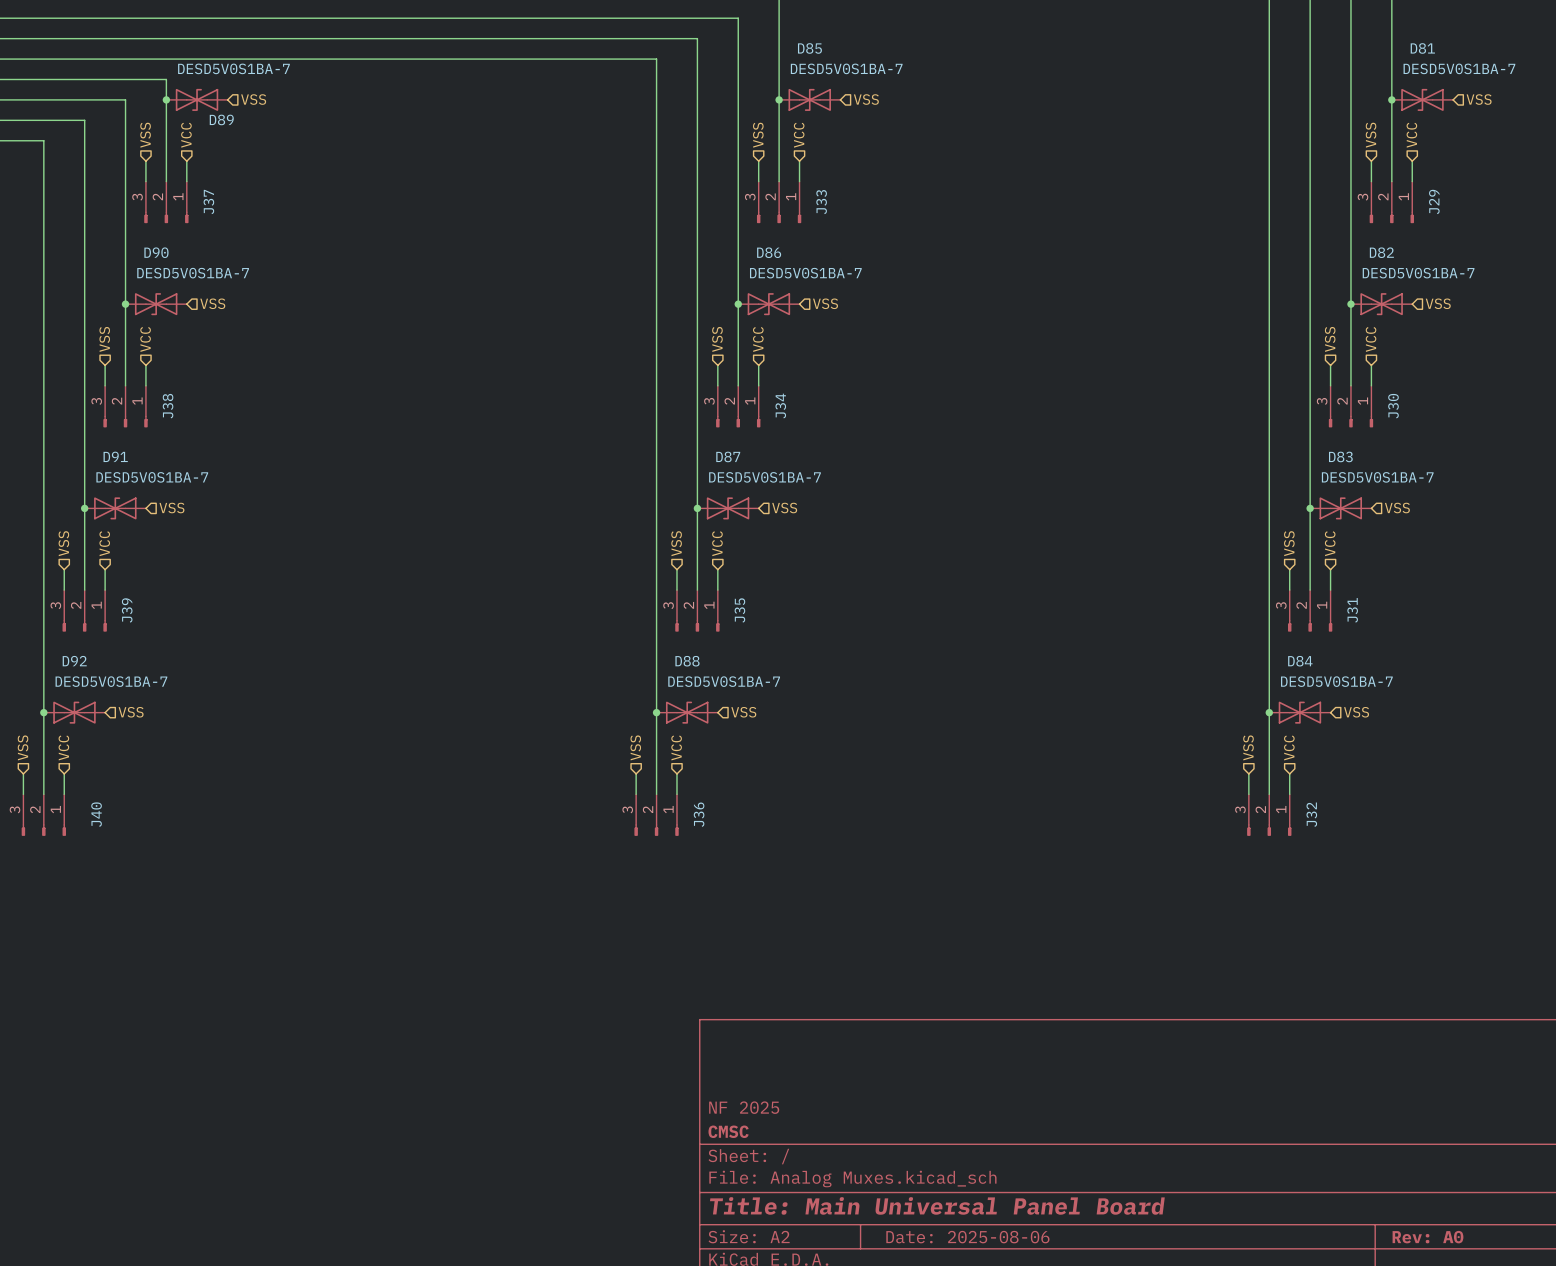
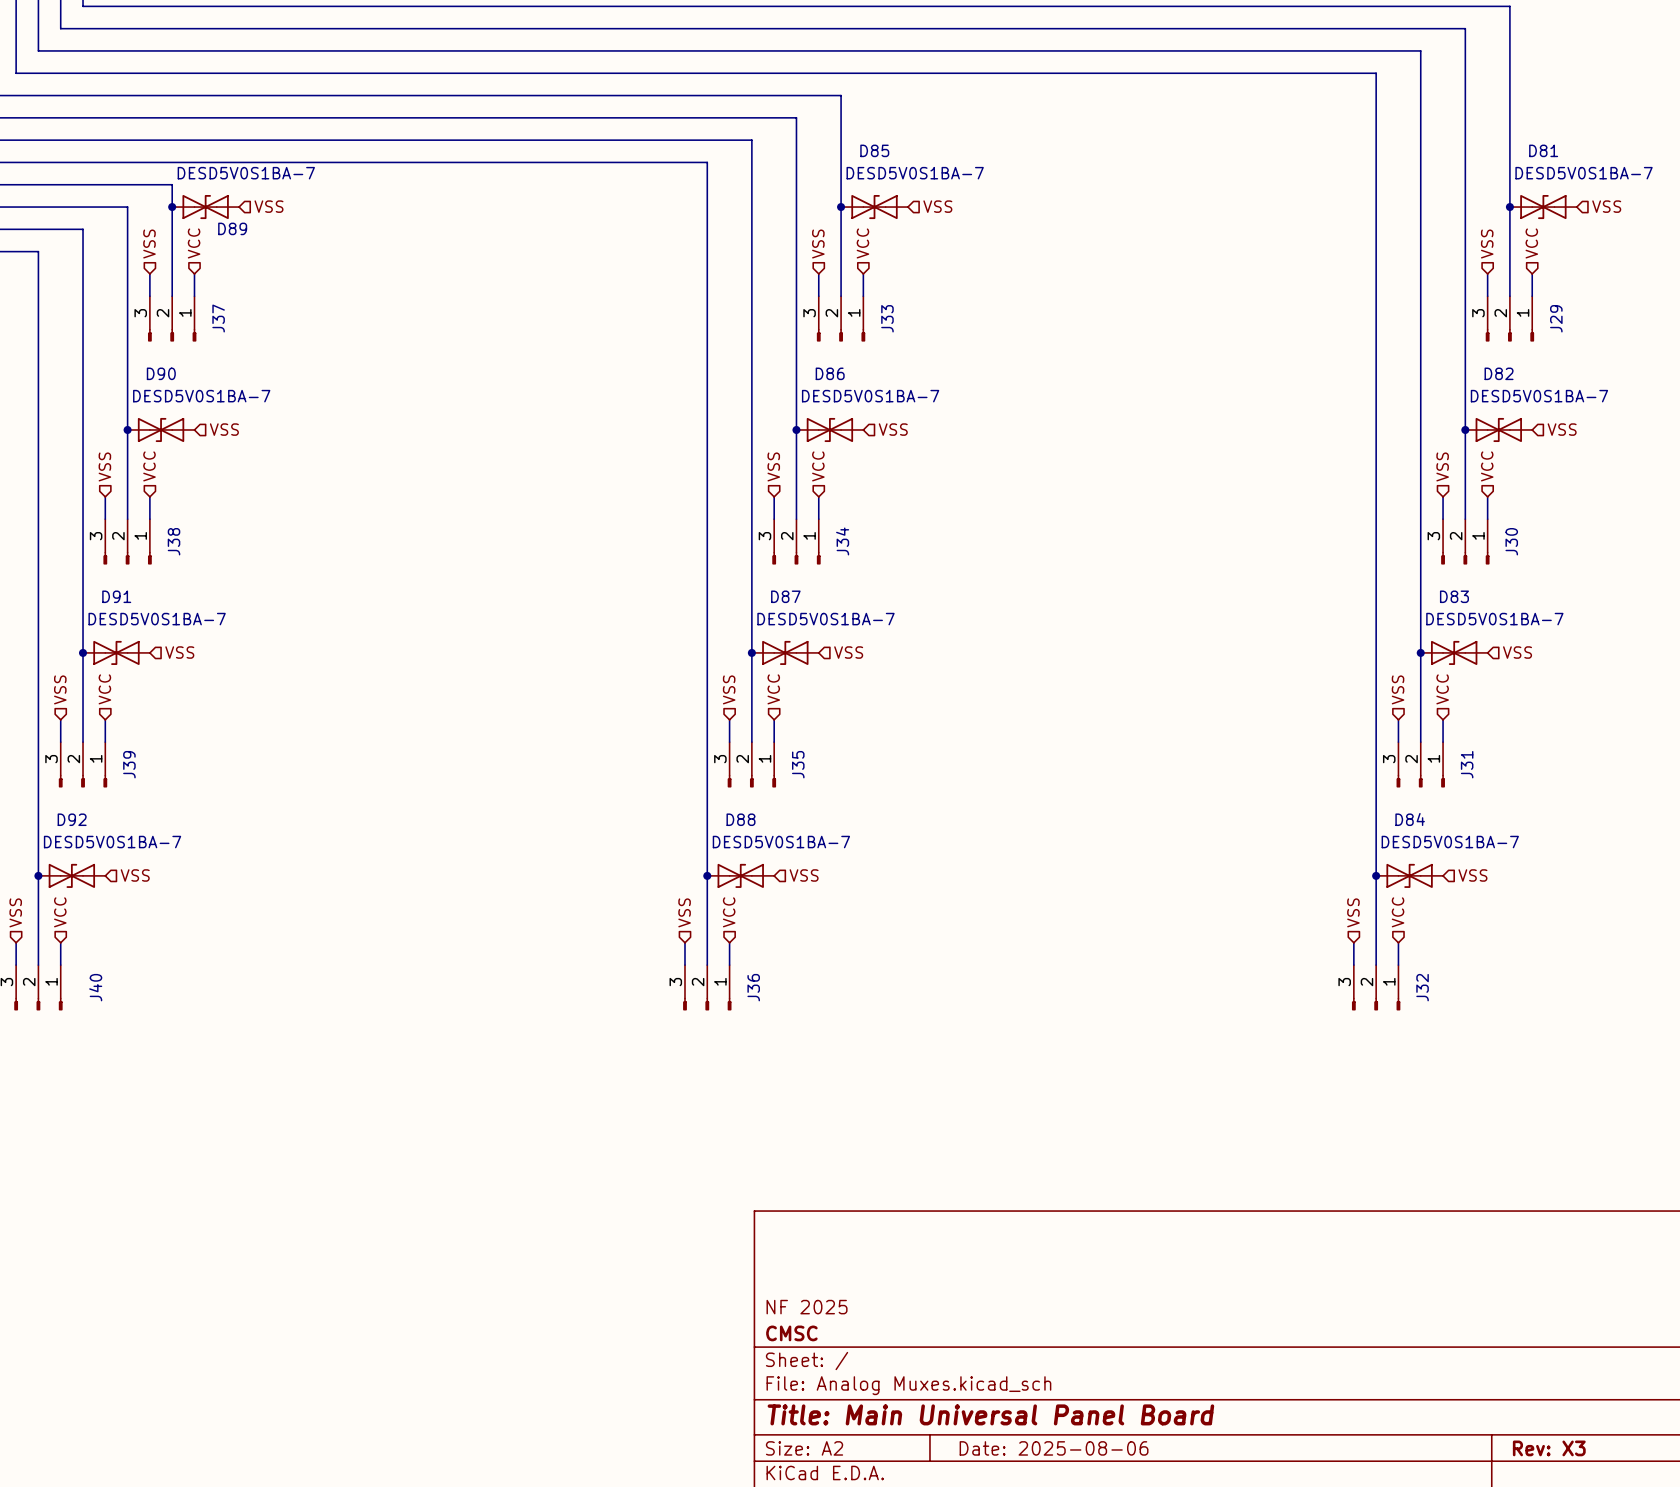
title block: Rev: A0 (1427, 1237) -> Rev: X3 (1549, 1448)

